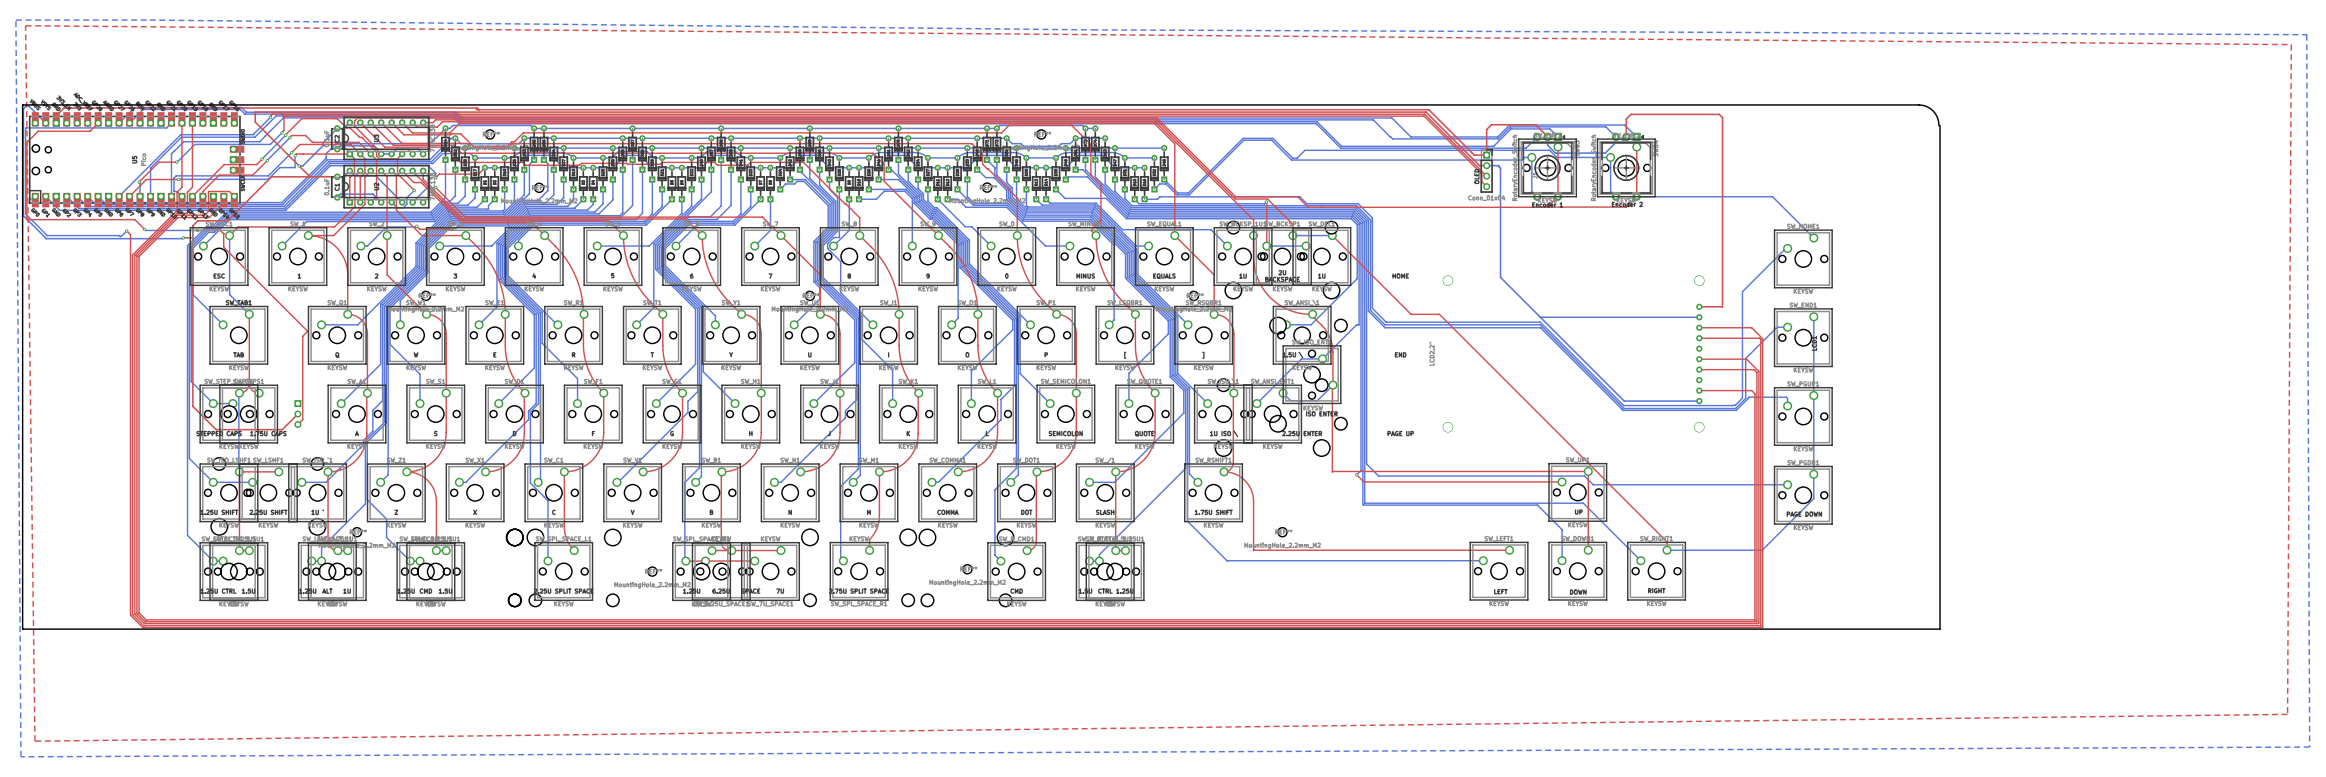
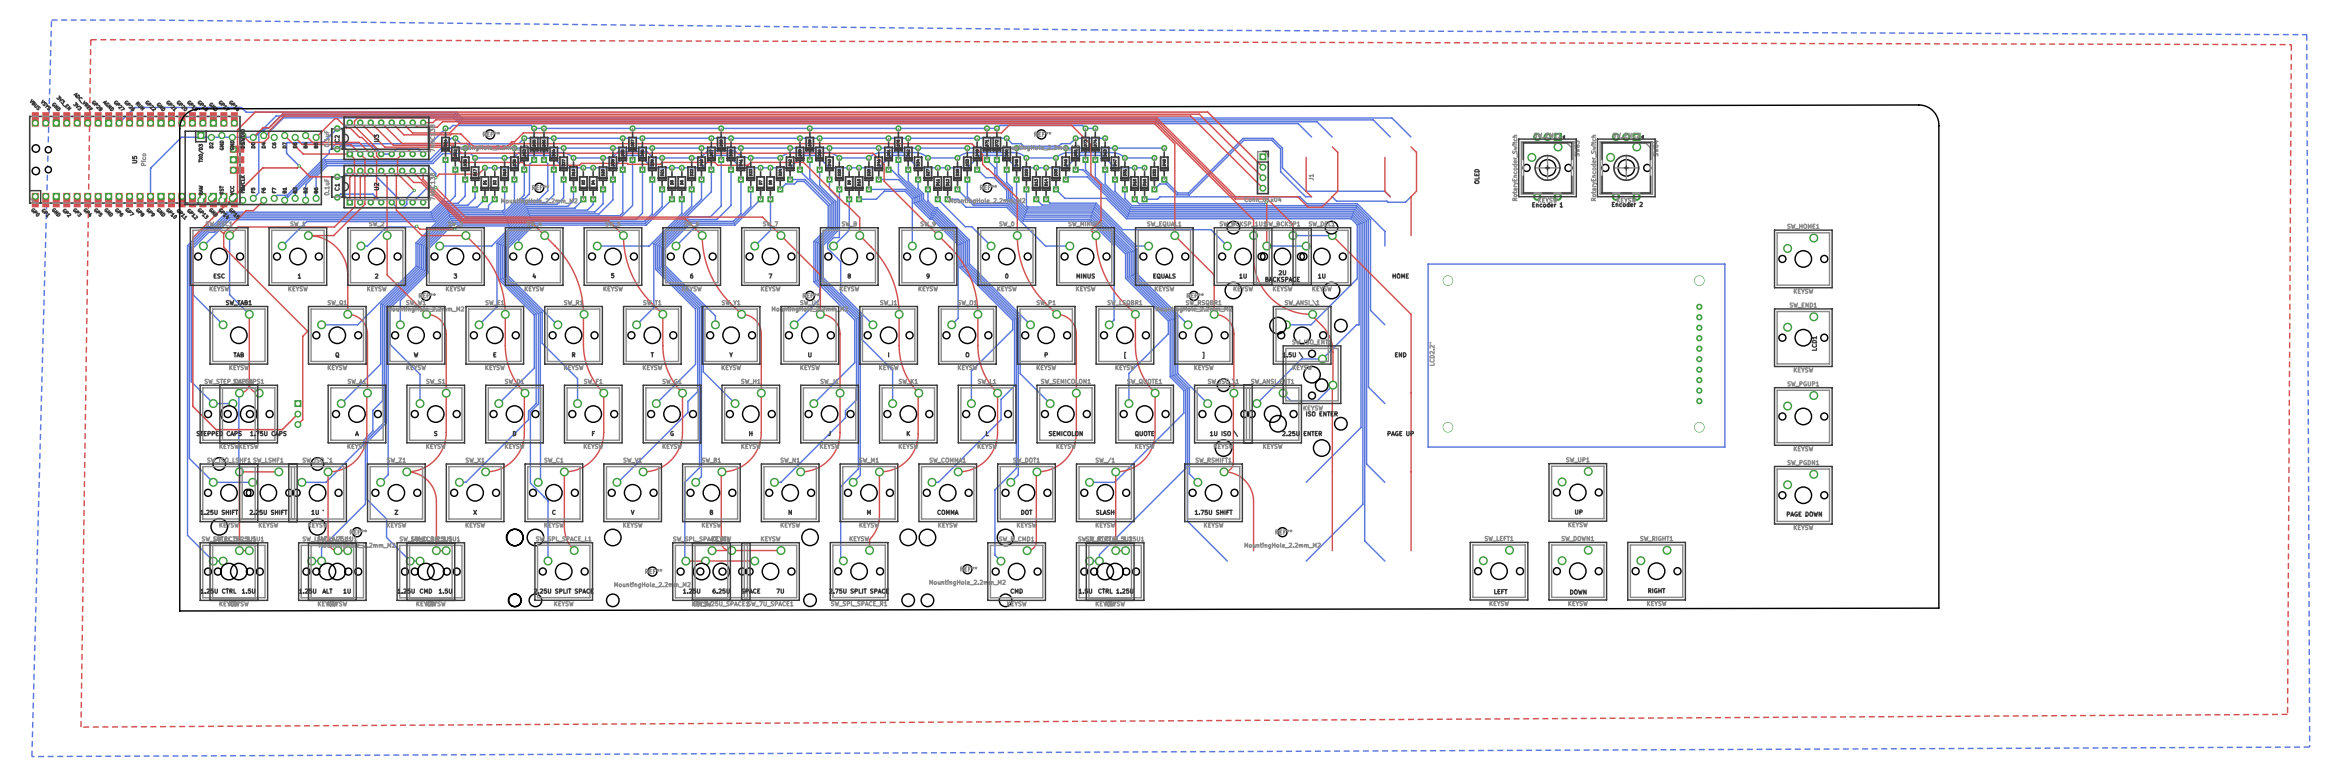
bottom zone outline: (149, 20) (15, 20) (20, 756) (2309, 747) -> (149, 20) (51, 20) (31, 756) (2309, 747)
top zone outline: (2291, 44) (25, 25) (34, 741) (2287, 714) -> (2291, 44) (90, 39) (80, 727) (2287, 714)
board edge: (1918, 104) (22, 104) (22, 629) -> (1918, 104) (192, 109) (184, 116) (179, 128) (179, 610) (1938, 608) (1938, 125)
bottom track: (25, 105) (28, 105) (45, 123) -> none
bottom track: (26, 105) (23, 108) (23, 215) (46, 238) (183, 238) -> none
top track: (476, 109) (1428, 109) (1474, 155) (1486, 155) (1486, 129) (1491, 124) (1535, 124) (1547, 136) -> none
top track: (479, 109) (477, 108) (64, 108) (56, 115) (56, 123) -> none
top track: (255, 112) (255, 122) (299, 165) -> (255, 112) (237, 129) (237, 193)
top track: (1207, 112) (1426, 112) (1479, 165) (1486, 165) -> (1207, 112) (1262, 167)
top track: (282, 114) (272, 114) (270, 117) -> (282, 114) (269, 127) (263, 127) (253, 137)
bottom track: (282, 114) (244, 114) (240, 109) (143, 109) (129, 123) -> (282, 114) (268, 128) (258, 133) (258, 192) (253, 198)
top track: (1199, 114) (1424, 114) (1486, 176) -> (1199, 114) (1262, 177)
top track: (283, 116) (283, 130) (281, 133) -> (283, 116) (268, 131) (268, 137) (263, 142) (249, 142) (242, 135)
top track: (1190, 116) (1424, 116) (1481, 173) (1481, 181) (1486, 186) -> (1190, 116) (1262, 188)
bottom track: (270, 117) (253, 134) (180, 134) (119, 196) -> none
via: (270, 117) -> none
top track: (334, 118) (301, 118) (285, 135) -> (334, 118) (316, 137)
top track: (98, 123) (89, 131) (38, 131) (26, 142) (26, 219) (134, 219) (144, 229) -> none
bottom track: (171, 123) (166, 127) (25, 128) (25, 213) (47, 235) (121, 236) (126, 230) -> none
top track: (181, 123) (181, 187) (177, 192) (177, 210) (132, 255) (132, 614) (143, 625) (1760, 625) (1760, 339) (1699, 338) -> none
top track: (192, 123) (192, 187) (187, 192) (187, 213) (176, 213) (134, 255) (134, 614) (144, 623) (1758, 623) (1758, 371) (1746, 359) (1699, 359) -> none
bottom track: (1298, 123) (1316, 123) (1340, 148) (1525, 148) (1537, 136) -> (1298, 123) (1311, 136)
board edge: (1940, 125) (1940, 629) -> none
bottom track: (281, 132) (270, 144) (194, 144) (176, 162) -> none
via: (281, 132) -> none
bottom track: (285, 135) (261, 159) -> none
via: (285, 135) -> none
top track: (305, 135) (291, 135) (289, 137) -> none
bottom track: (265, 136) (259, 141) (183, 141) (171, 153) (171, 196) -> none
bottom track: (1332, 136) (1341, 146) (1493, 146) (1510, 128) (1549, 128) (1557, 136) -> none
bottom track: (1390, 136) (1392, 138) (1498, 138) (1510, 126) (1605, 126) (1615, 136) -> none
bottom track: (1410, 136) (1497, 136) (1509, 124) (1624, 124) (1636, 136) -> none
top track: (1626, 136) (1626, 119) (1630, 114) (1719, 114) (1722, 117) (1722, 306) (1699, 306) -> none
bottom track: (1626, 136) (1620, 142) (1615, 142) (1605, 153) (1555, 153) (1547, 142) -> none
bottom track: (289, 137) (266, 160) -> none
via: (289, 137) -> none
bottom track: (1272, 138) (1292, 158) (1297, 158) (1304, 150) (1549, 150) (1556, 157) (1610, 157) (1610, 191) (1615, 196) -> (1272, 138) (1282, 148) (1282, 167) (1305, 191) (1384, 191) (1390, 196)
bottom track: (323, 142) (323, 145) (302, 165) (299, 165) -> (323, 142) (286, 142) (286, 153) (299, 165)
top track: (302, 144) (291, 152) -> (302, 144) (295, 137)
top track: none -> (1411, 146) (1416, 152) (1416, 191) (1410, 196) (1411, 235)
top track: (1558, 146) (1558, 196) (1547, 207) (1321, 207) -> (1332, 146) (1337, 152) (1337, 191) (1321, 207)
top track: (1636, 146) (1636, 196) (1626, 207) (1547, 207) -> none
bottom track: (1280, 148) (1291, 160) (1522, 160) (1524, 157) (1531, 157) (1531, 191) (1537, 196) -> (1280, 148) (1280, 171) (1305, 196) (1311, 196)
bottom track: (329, 150) (326, 153) (326, 158) (281, 202) (104, 202) (98, 196) -> (329, 150) (329, 152) (287, 195) (277, 195) (274, 198)
bottom track: (291, 152) (268, 175) (176, 175) (173, 178) (173, 191) (181, 196) -> none
via: (291, 152) -> none
top track: (303, 154) (294, 155) -> (303, 154) (284, 135)
bottom track: (295, 155) (295, 167) (279, 167) (268, 179) (179, 179) -> none
via: (295, 155) -> none
top track: none -> (1306, 157) (1306, 191) (1311, 196)
top track: none -> (1384, 157) (1384, 191) (1390, 196)
top track: (261, 159) (256, 164) (224, 164) (192, 196) -> none
via: (261, 159) -> none
bottom track: (327, 159) (282, 204) (95, 204) (87, 196) -> (327, 159) (287, 197) (285, 197) (284, 200)
top track: (267, 160) (252, 175) (219, 175) (202, 191) (202, 196) -> none
via: (267, 160) -> none
bottom track: (328, 161) (284, 206) (87, 206) (77, 196) -> (328, 161) (325, 161) (295, 192) (295, 198)
top track: (176, 162) (158, 162) (139, 181) -> none
via: (176, 162) -> none
bottom track: (329, 163) (284, 208) (78, 208) (66, 196) -> (329, 163) (326, 163) (305, 184) (305, 200)
bottom track: (330, 165) (285, 210) (59, 210) (45, 196) -> (330, 165) (327, 165) (316, 176) (316, 198)
bottom track: (1486, 165) (1498, 165) (1500, 168) (1500, 277) (1624, 401) (1699, 401) -> none
part: none -> (253, 167)
part position: (1486, 170) -> (1262, 172)
top track: (310, 176) (271, 176) (227, 220) (197, 220) (192, 225) (192, 237) -> (299, 165) (297, 167) (262, 167) (192, 237)
top track: (178, 179) (146, 179) (129, 196) -> none
via: (178, 179) -> none
bottom track: (139, 182) (140, 196) -> none
via: (139, 182) -> none
top track: (223, 196) (223, 203) (209, 217) (177, 217) (139, 256) (139, 612) (146, 619) (1754, 619) -> none
top track: (234, 196) (229, 191) (208, 191) (208, 211) (204, 215) (177, 215) (136, 255) (136, 613) (145, 621) (1756, 621) (1756, 372) (1754, 369) (1699, 369) -> none
bottom track: none -> (1332, 196) (1336, 201) (1388, 202) (1405, 202) (1410, 196)
bottom track: (1636, 196) (1772, 196) (1813, 238) -> none
top track: none -> (263, 200) (253, 210) (246, 210) (223, 233)
bottom track: (1357, 203) (1372, 217) (1372, 308) (1385, 322) (1540, 322) (1623, 405) (1735, 405) (1742, 398) (1742, 291) (1787, 248) -> (1357, 203) (1384, 231) (1384, 246)
bottom track: (144, 229) (197, 230) -> none
via: (144, 229) -> none
top track: (126, 230) (130, 234) (130, 615) (142, 627) (1762, 627) (1762, 338) (1751, 327) (1699, 327) -> none
via: (126, 230) -> none
via: (197, 230) -> none
top track: (183, 237) (192, 237) -> none
via: (183, 237) -> none
bottom track: none -> (1428, 264) (1724, 264) (1724, 447) (1428, 447) (1428, 264)
bottom track: (1368, 311) (1385, 327) (1540, 327) (1623, 410) (1736, 410) (1748, 397) (1786, 397) (1787, 406) -> (1368, 311) (1368, 387) (1384, 403)
top track: (1411, 314) (1439, 314) (1667, 541) (1667, 550) -> (1411, 314) (1411, 550)
bottom track: (1813, 316) (1813, 498) (1762, 550) (1667, 550) -> none
bottom track: (1540, 317) (1699, 317) -> none
bottom track: (1384, 324) (1540, 324) (1623, 408) (1735, 408) (1745, 398) (1745, 358) (1776, 327) (1787, 327) -> none
top track: (1699, 390) (1751, 390) (1754, 393) (1754, 619) -> none
bottom track: (1360, 427) (1360, 470) (1356, 474) -> (1360, 427) (1306, 482)
top track: (1332, 471) (1588, 471) (1588, 550) -> (1332, 471) (1332, 550)
top track: (1356, 474) (1363, 481) (1562, 481) -> none
via: (1356, 474) -> none
bottom track: (1378, 476) (1584, 476) (1593, 484) (1787, 484) -> (1378, 476) (1384, 482)
bottom track: (1364, 503) (1583, 503) (1640, 560) -> (1364, 503) (1364, 540) (1384, 561)
bottom track: (1362, 504) (1537, 505) (1562, 529) (1562, 560) -> (1362, 504) (1306, 561)
top track: (1509, 550) (1253, 550) -> none
bottom track: (1483, 560) (1227, 561) -> none
board edge: (23, 629) (1940, 629) -> none

